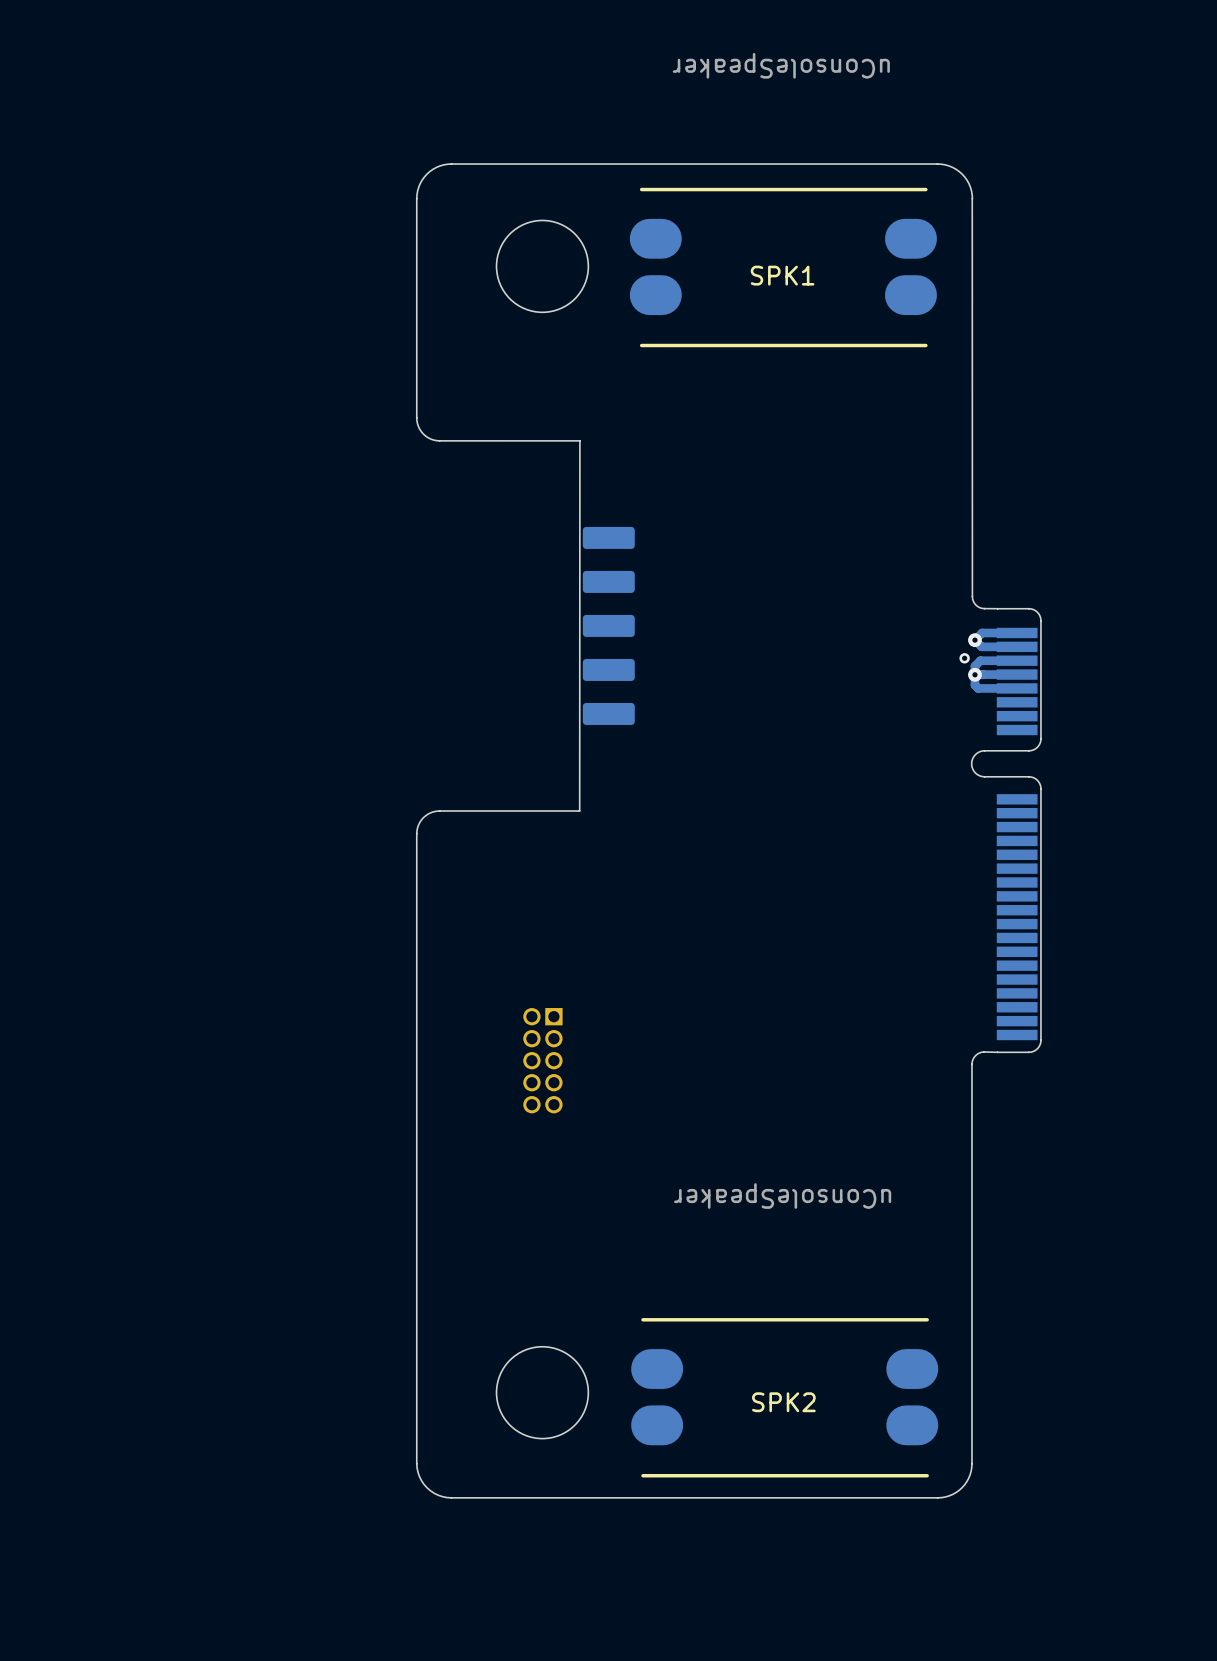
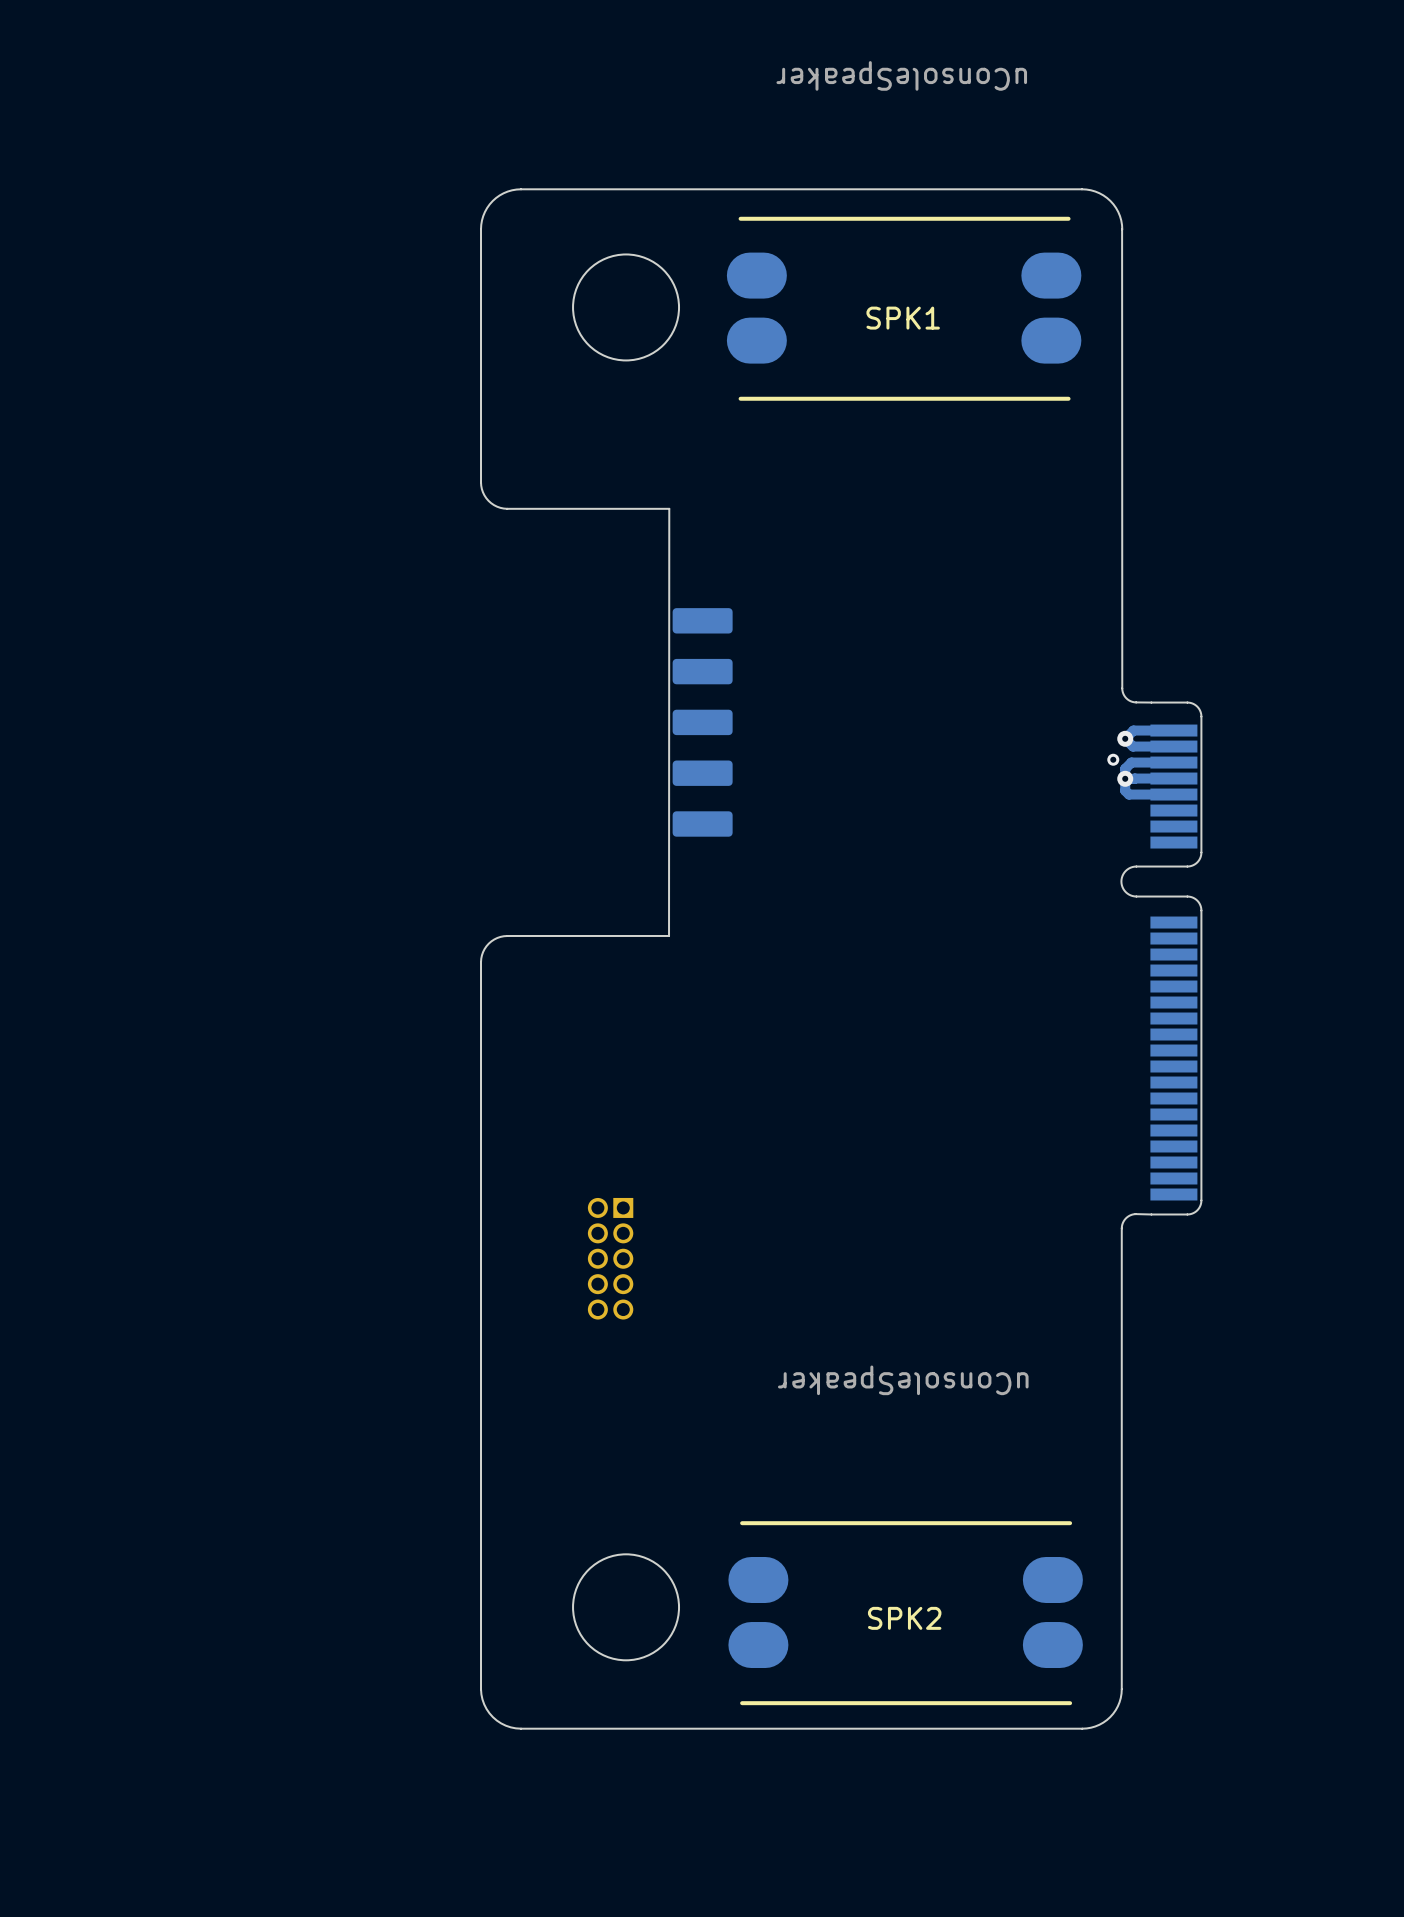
part position: (542, 1060) -> (610, 1258)

